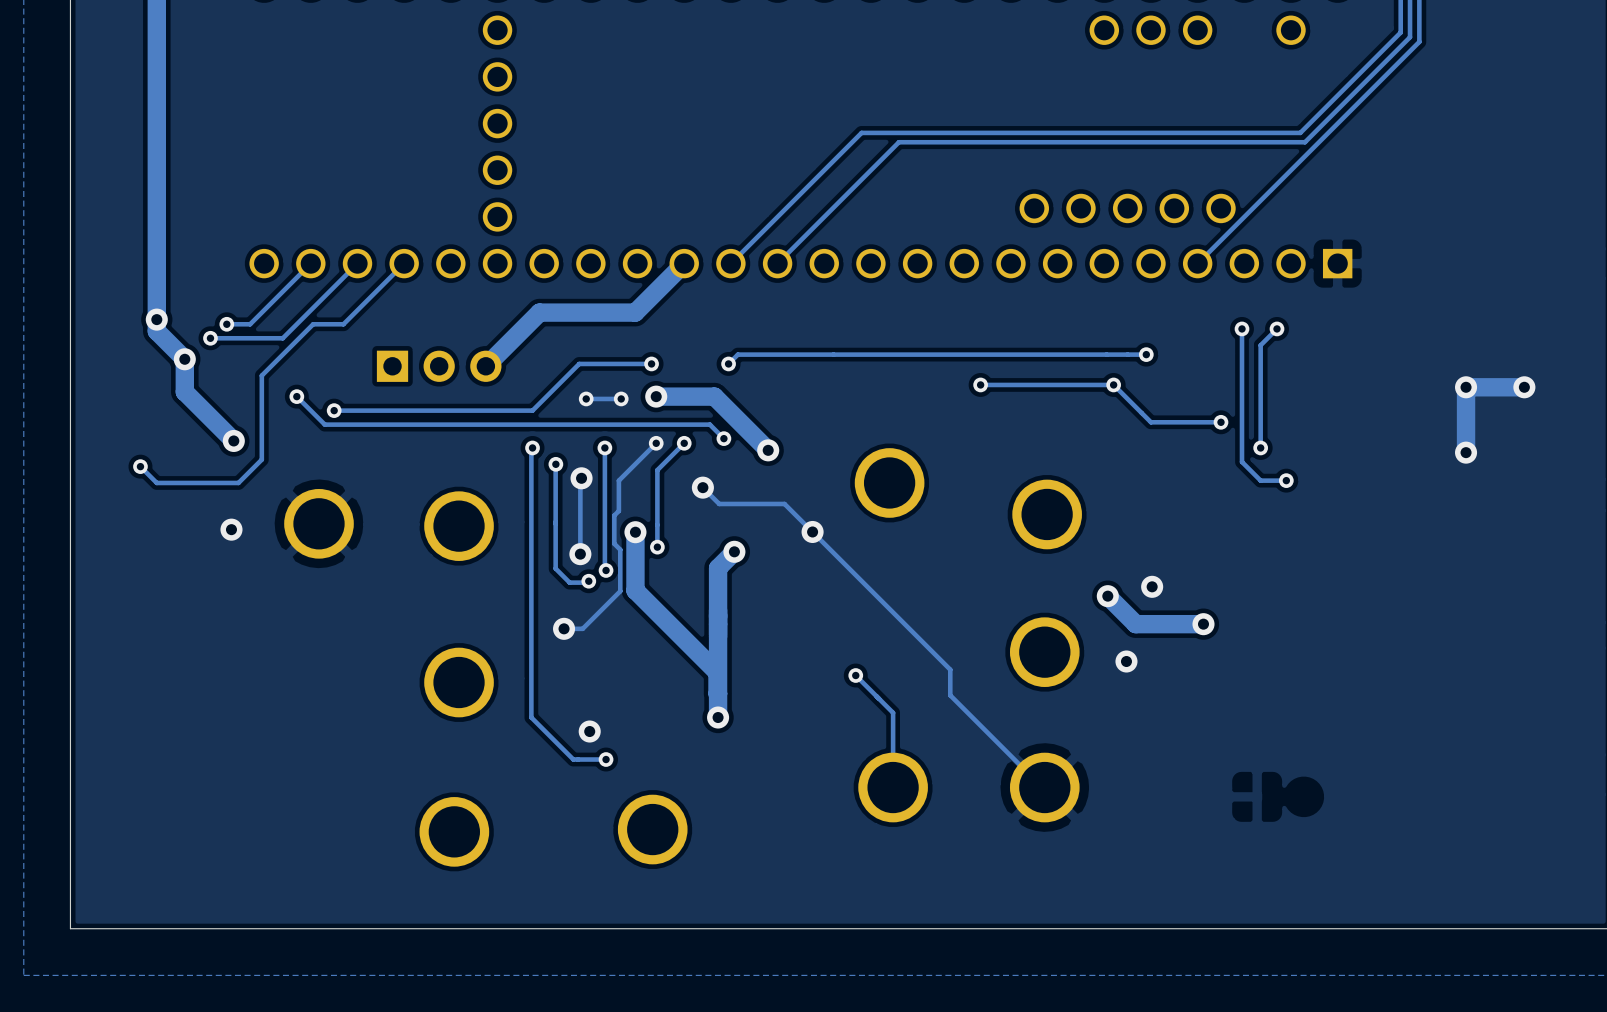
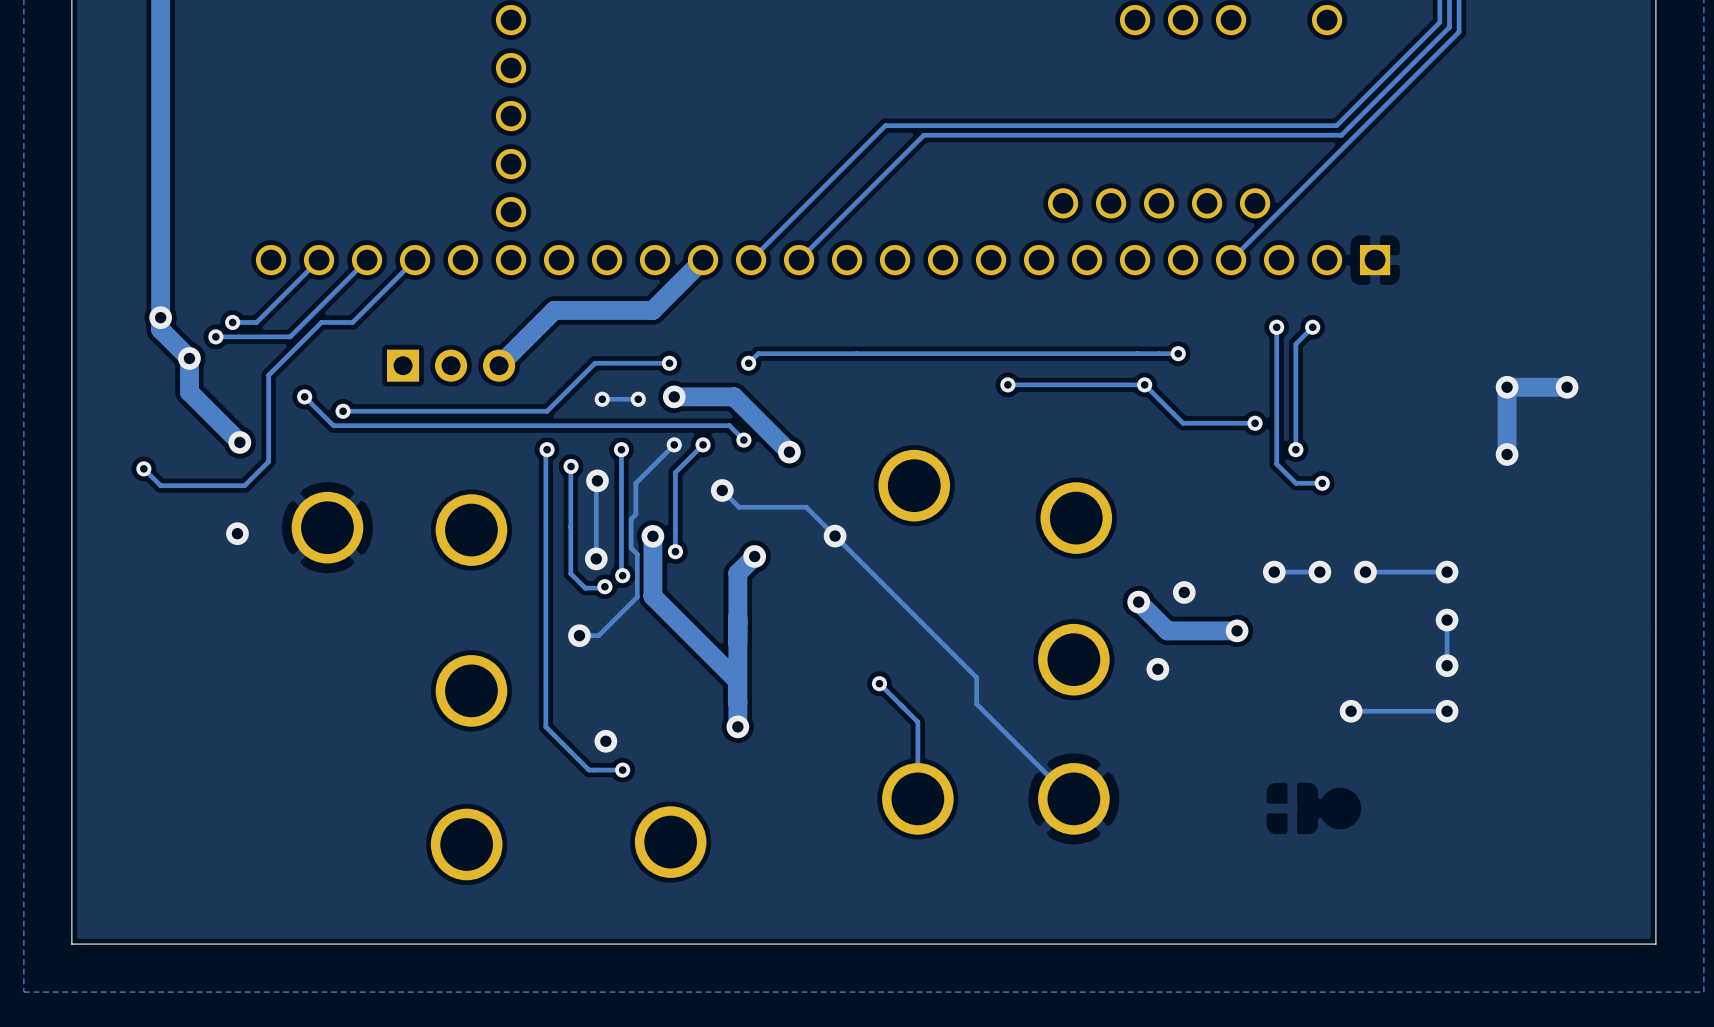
via: none -> (1274, 572)
track: none -> (1319, 572) (1274, 572)
via: none -> (1319, 572)
via: none -> (1365, 572)
track: none -> (1447, 572) (1365, 572)
via: none -> (1447, 572)
track: none -> (1447, 620) (1447, 665)
via: none -> (1447, 620)
via: none -> (1447, 665)
via: none -> (1351, 711)
track: none -> (1447, 711) (1351, 711)
via: none -> (1447, 711)

